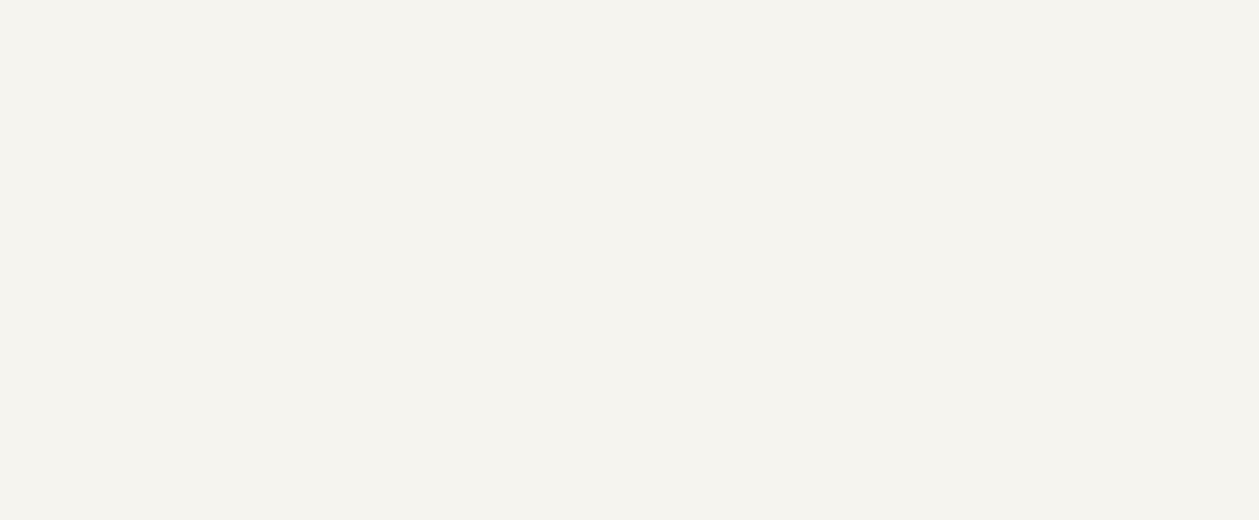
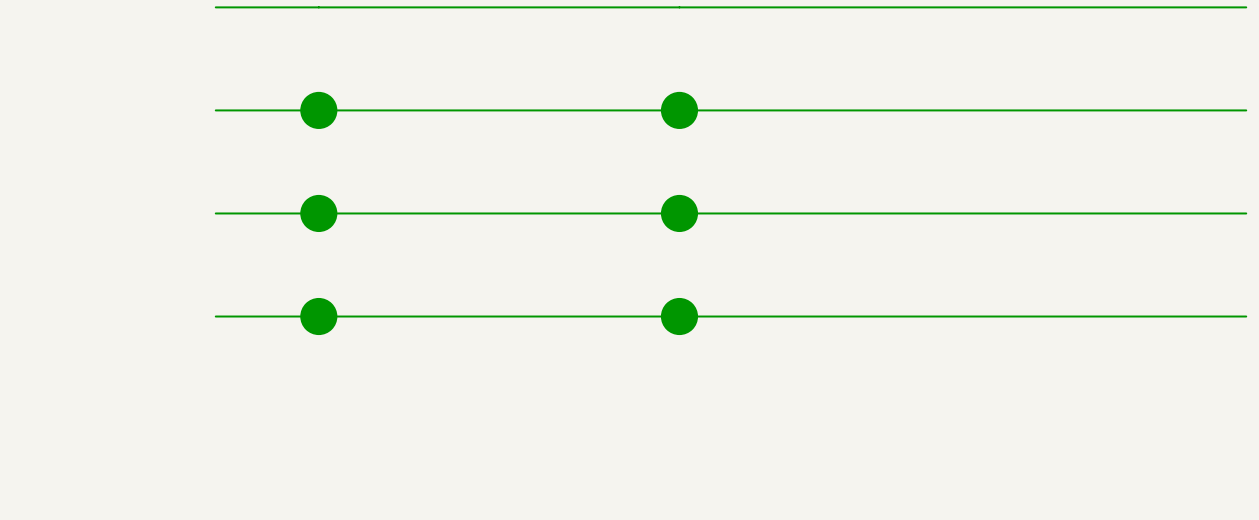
wire: none -> (215, 7) (1246, 7)
wire: none -> (215, 110) (1246, 110)
junction: none -> (318, 110)
junction: none -> (679, 110)
wire: none -> (215, 213) (1246, 213)
junction: none -> (318, 213)
junction: none -> (679, 213)
wire: none -> (215, 316) (1246, 316)
junction: none -> (318, 316)
junction: none -> (679, 316)

